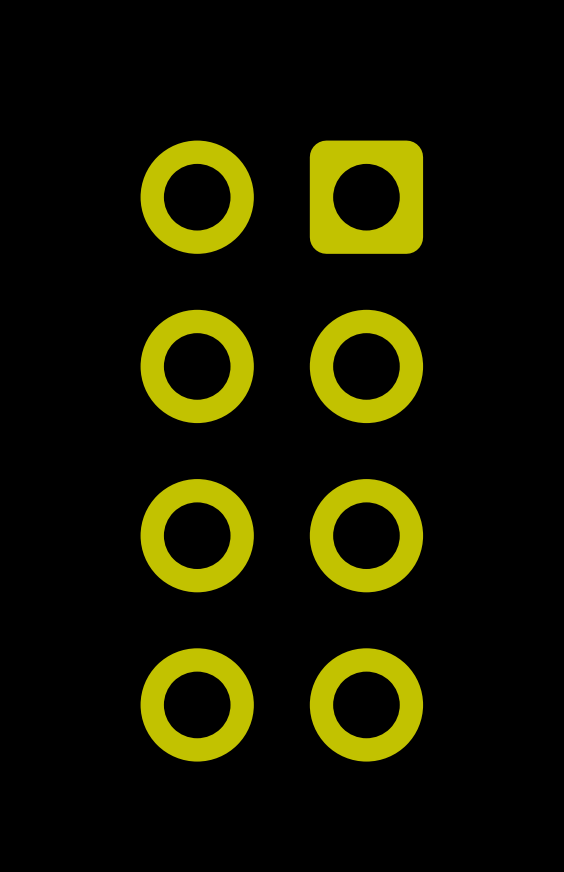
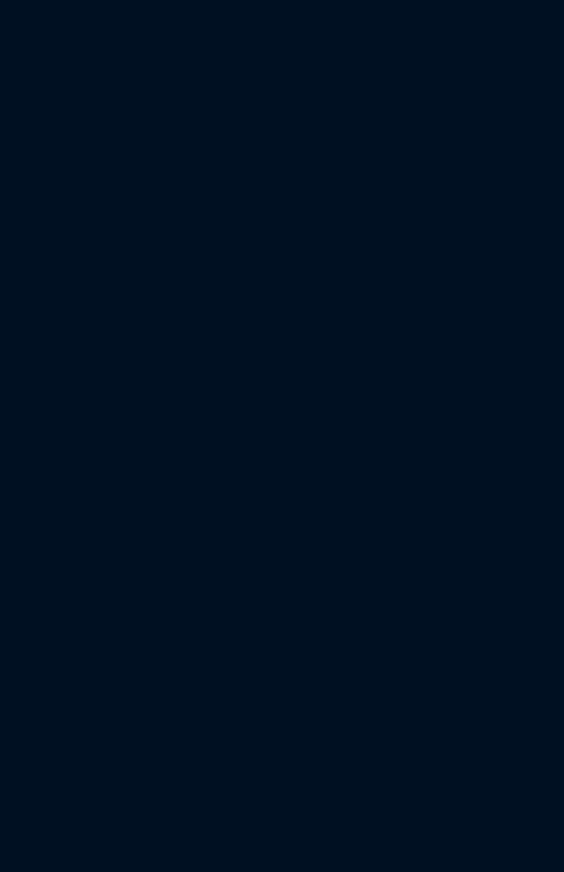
part: (281, 451) -> none

